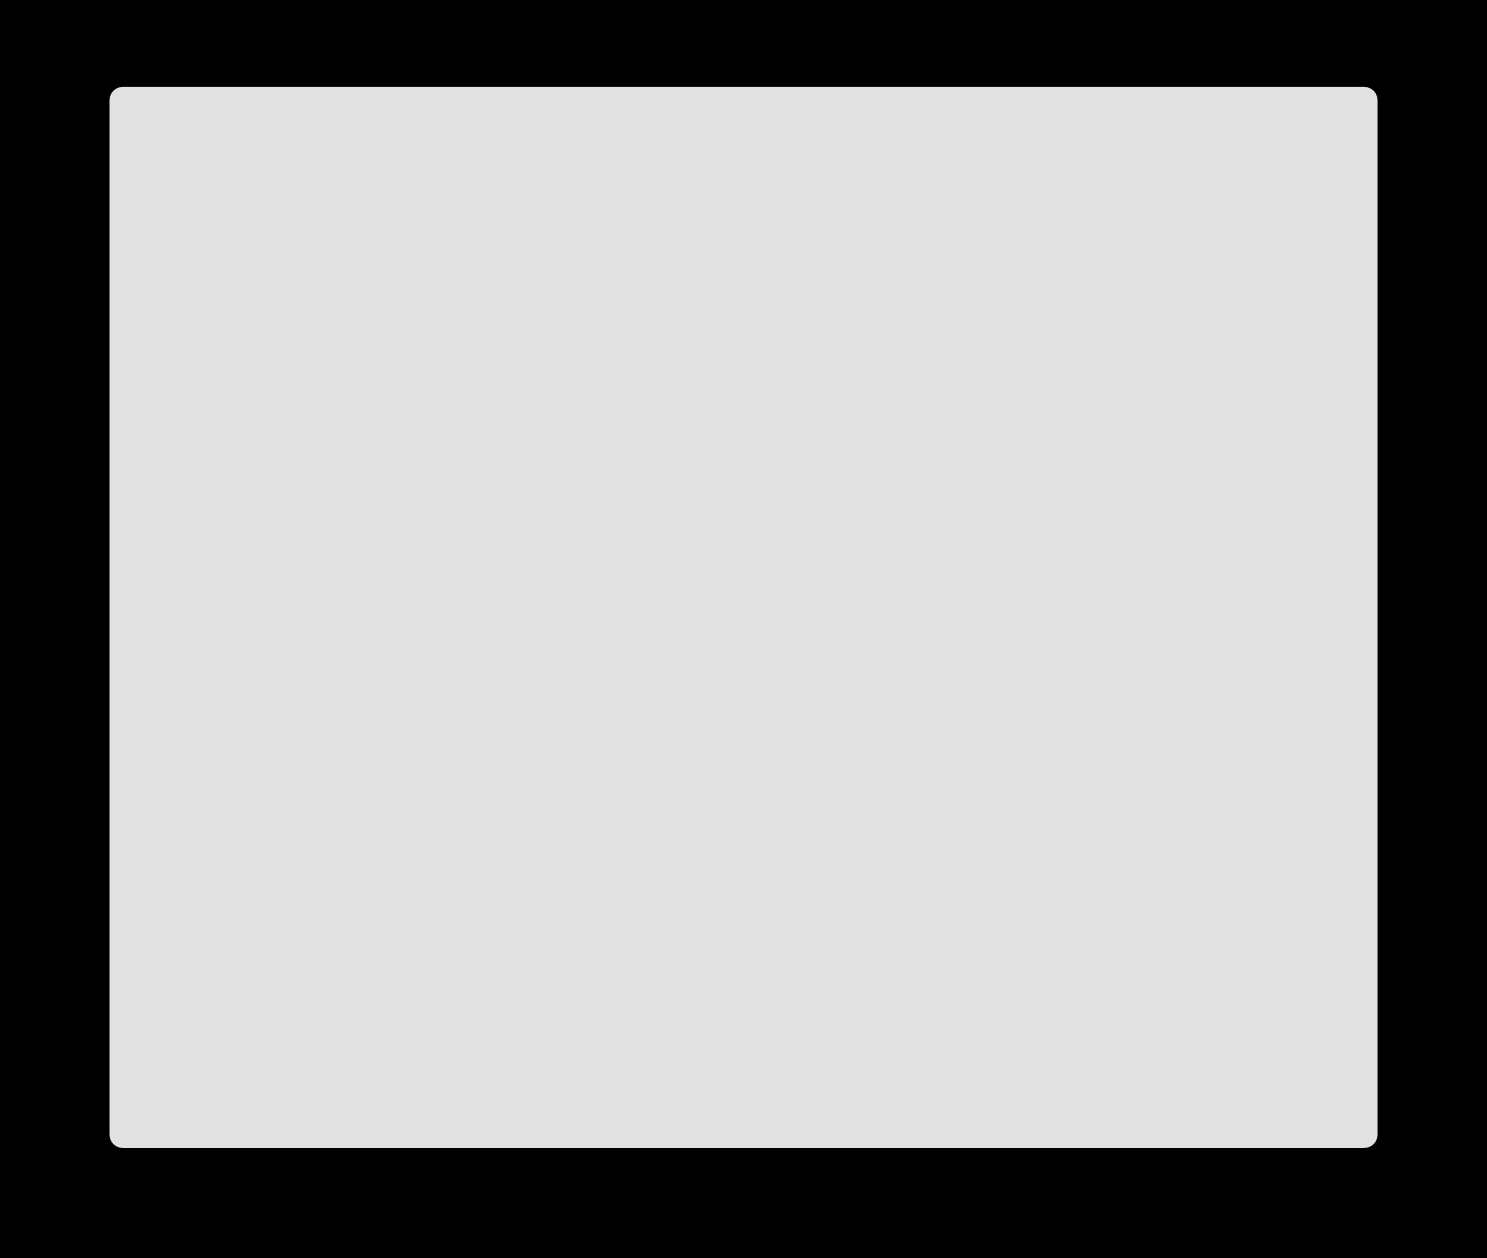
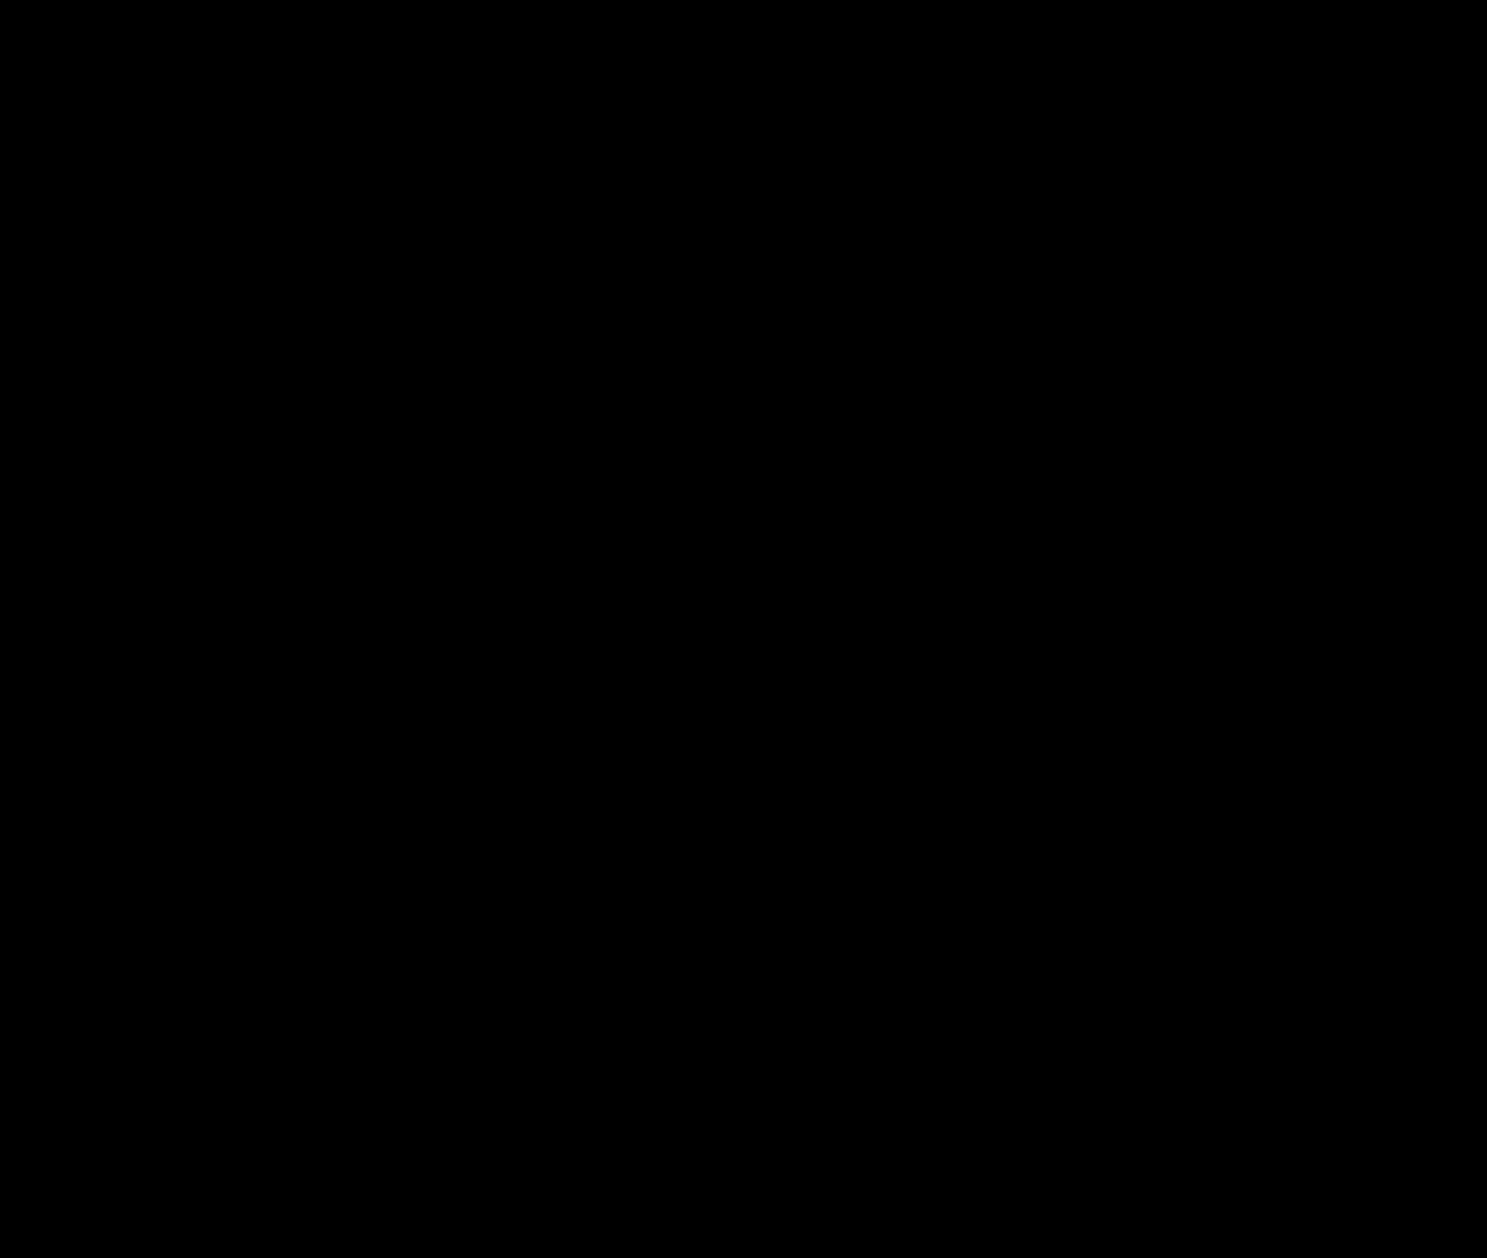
drawing: [109, 86, 1378, 1148] -> none

